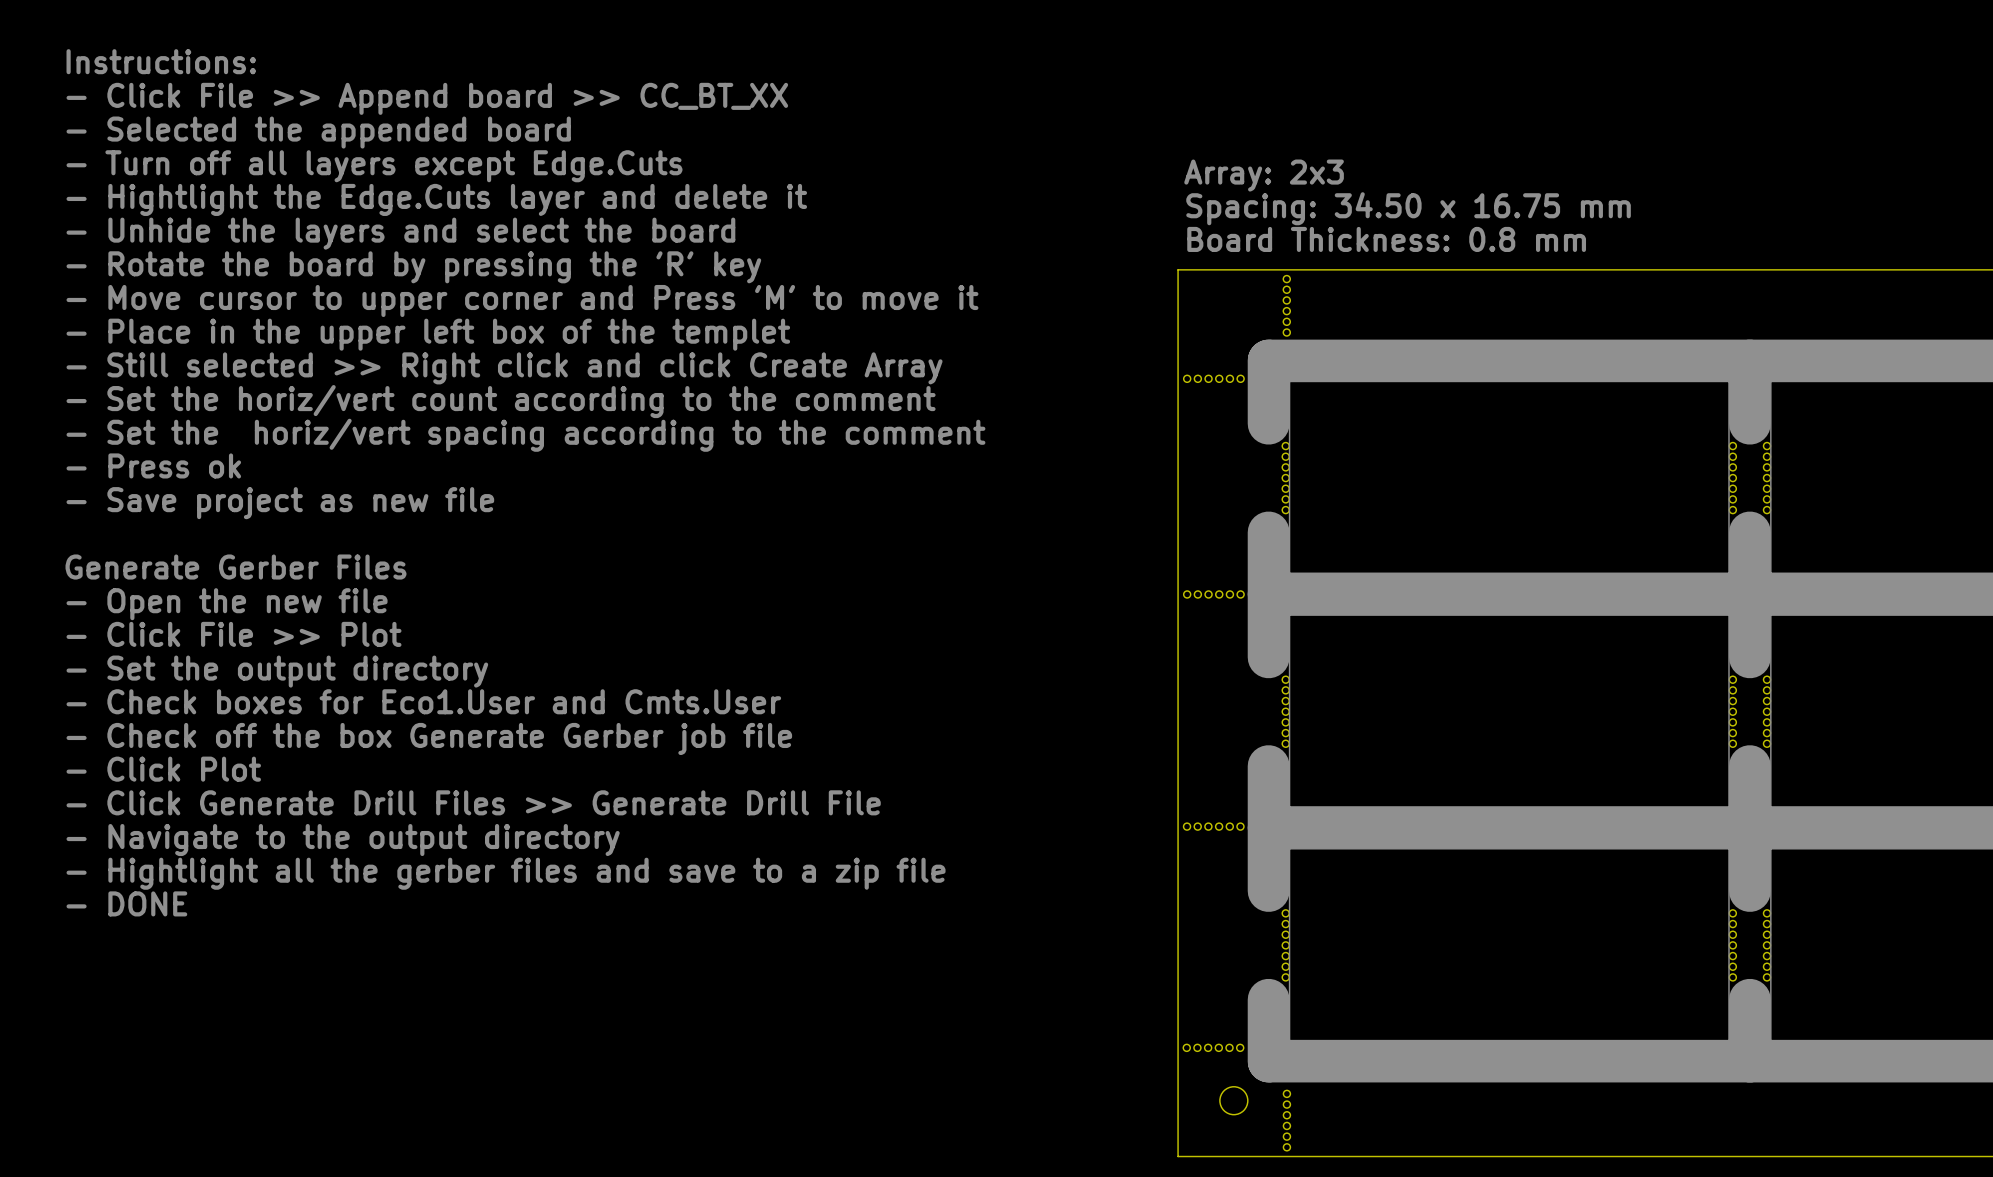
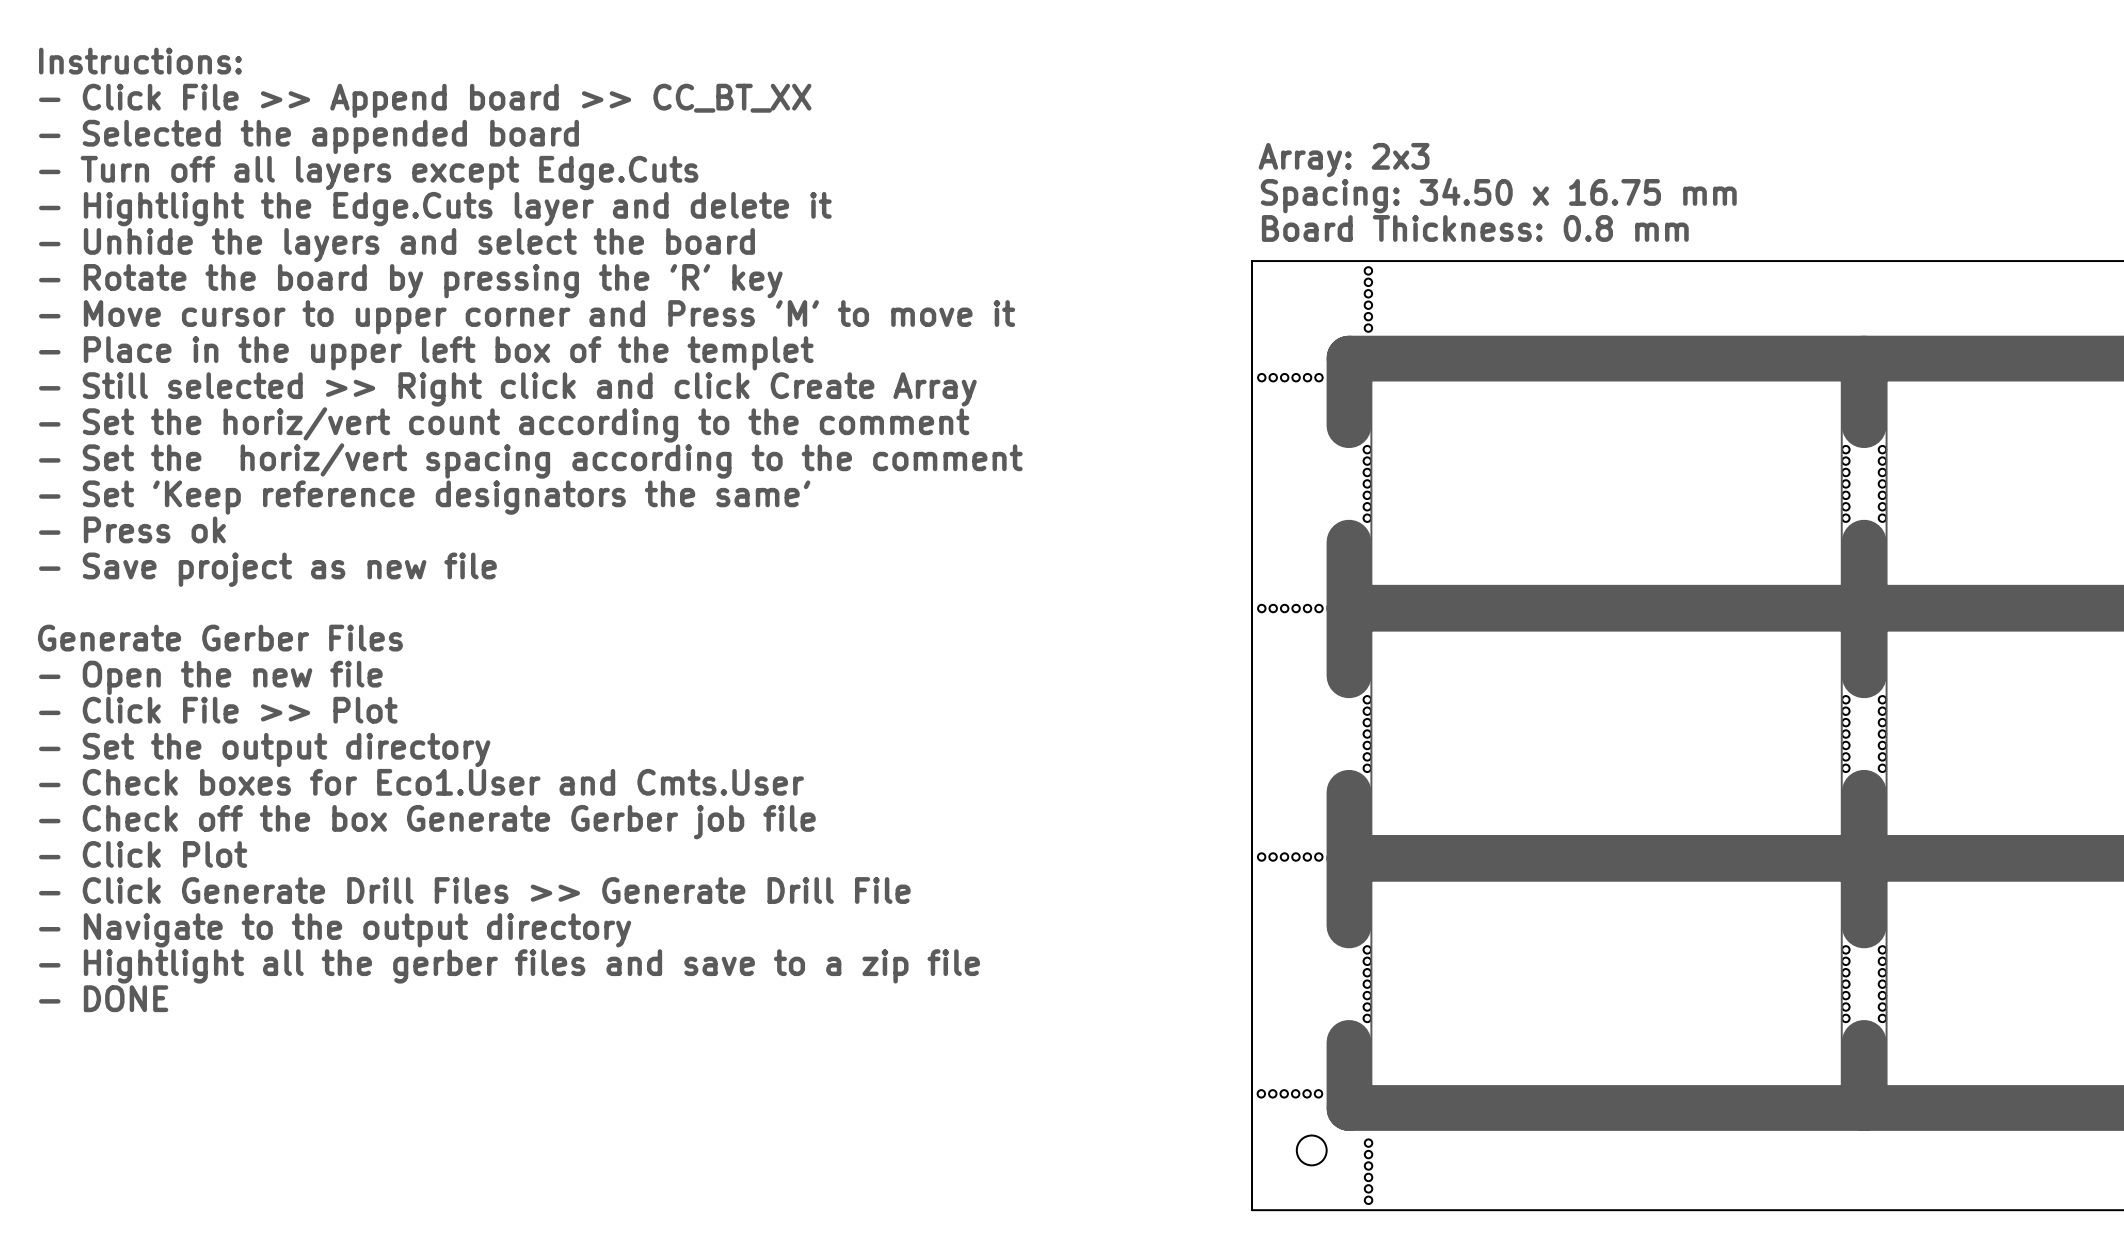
text position: Instructions: (161, 61) -> Instructions: (140, 61)
text position: - Click File >> Append board >> CC_BT_XX (427, 98) -> - Click File >> Append board >> CC_BT_XX (425, 100)
text position: - Selected the appended board (318, 132) -> - Selected the appended board (308, 136)
text position: - Turn off all layers except Edge.Cuts (374, 166) -> - Turn off all layers except Edge.Cuts (368, 173)
text position: - Hightlight the Edge.Cuts layer and delete it (436, 199) -> - Hightlight the Edge.Cuts layer and delete it (435, 209)
text position: - Unhide the layers and select the board (400, 233) -> - Unhide the layers and select the board (396, 245)
text position: - Rotate the board by pressing the 'R' key (413, 267) -> - Rotate the board by pressing the 'R' key (410, 281)
text position: - Move cursor to upper corner and Press 'M' to move it (522, 300) -> - Move cursor to upper corner and Press 'M' to move it (527, 317)
text position: - Place in the upper left box of the templet (428, 334) -> - Place in the upper left box of the templet (426, 353)
text position: - Still selected >> Right click and click Create Array (504, 368) -> - Still selected >> Right click and click Create Array (507, 389)
text position: - Set the horiz/vert count according to the comment (501, 401) -> - Set the horiz/vert count according to the comment (504, 424)
text position: - Set the horiz/vert spacing according to the comment (525, 435) -> - Set the horiz/vert spacing according to the comment (530, 460)
text position: - Press ok (153, 465) -> - Press ok (132, 529)
text: none -> - Set 'Keep reference designators the same' (424, 497)
text position: - Save project as new file (280, 503) -> - Save project as new file (267, 569)
text position: Generate Gerber Files (235, 567) -> Generate Gerber Files (220, 638)
text position: - Open the new file (227, 604) -> - Open the new file (210, 677)
text position: - Click File >> Plot (234, 634) -> - Click File >> Plot (218, 710)
text position: - Set the output directory (277, 671) -> - Set the output directory (264, 750)
text position: - Check boxes for Eco1.User and Cmts.User (423, 701) -> - Check boxes for Eco1.User and Cmts.User (421, 782)
text position: - Check off the box Generate Gerber job file (429, 738) -> - Check off the box Generate Gerber job file (427, 822)
text position: - Click Plot (163, 769) -> - Click Plot (143, 854)
text position: - Click Generate Drill Files >> Generate Drill File (473, 802) -> - Click Generate Drill Files >> Generate Drill File (474, 890)
text position: - Navigate to the output directory (343, 840) -> - Navigate to the output directory (335, 930)
text position: - Hightlight all the gerber files and save to a zip file (506, 873) -> - Hightlight all the gerber files and save to a zip file (509, 966)
text position: - DONE (126, 903) -> - DONE (103, 998)

